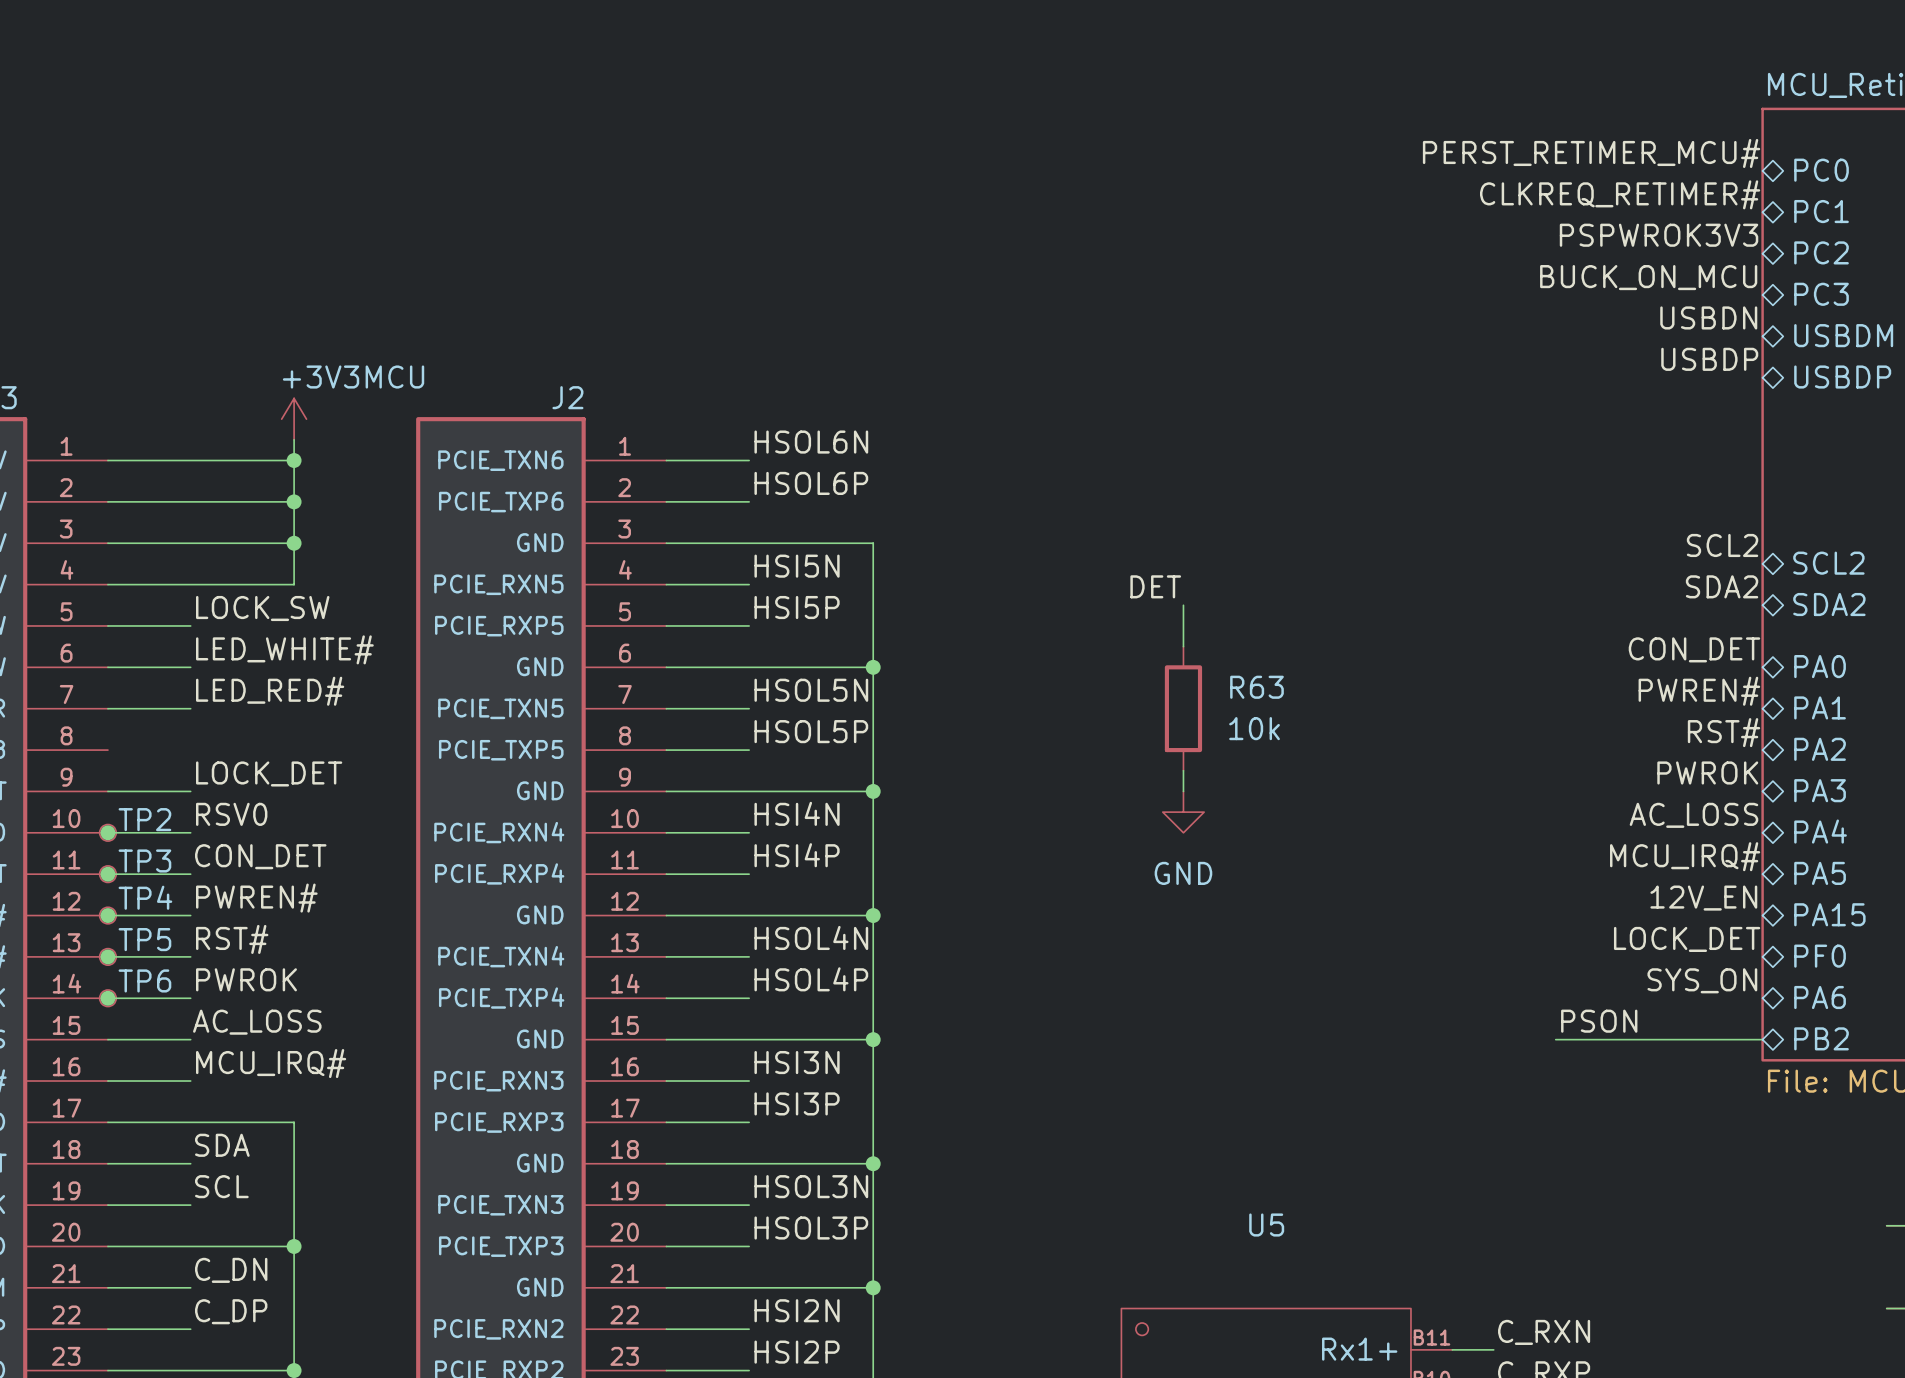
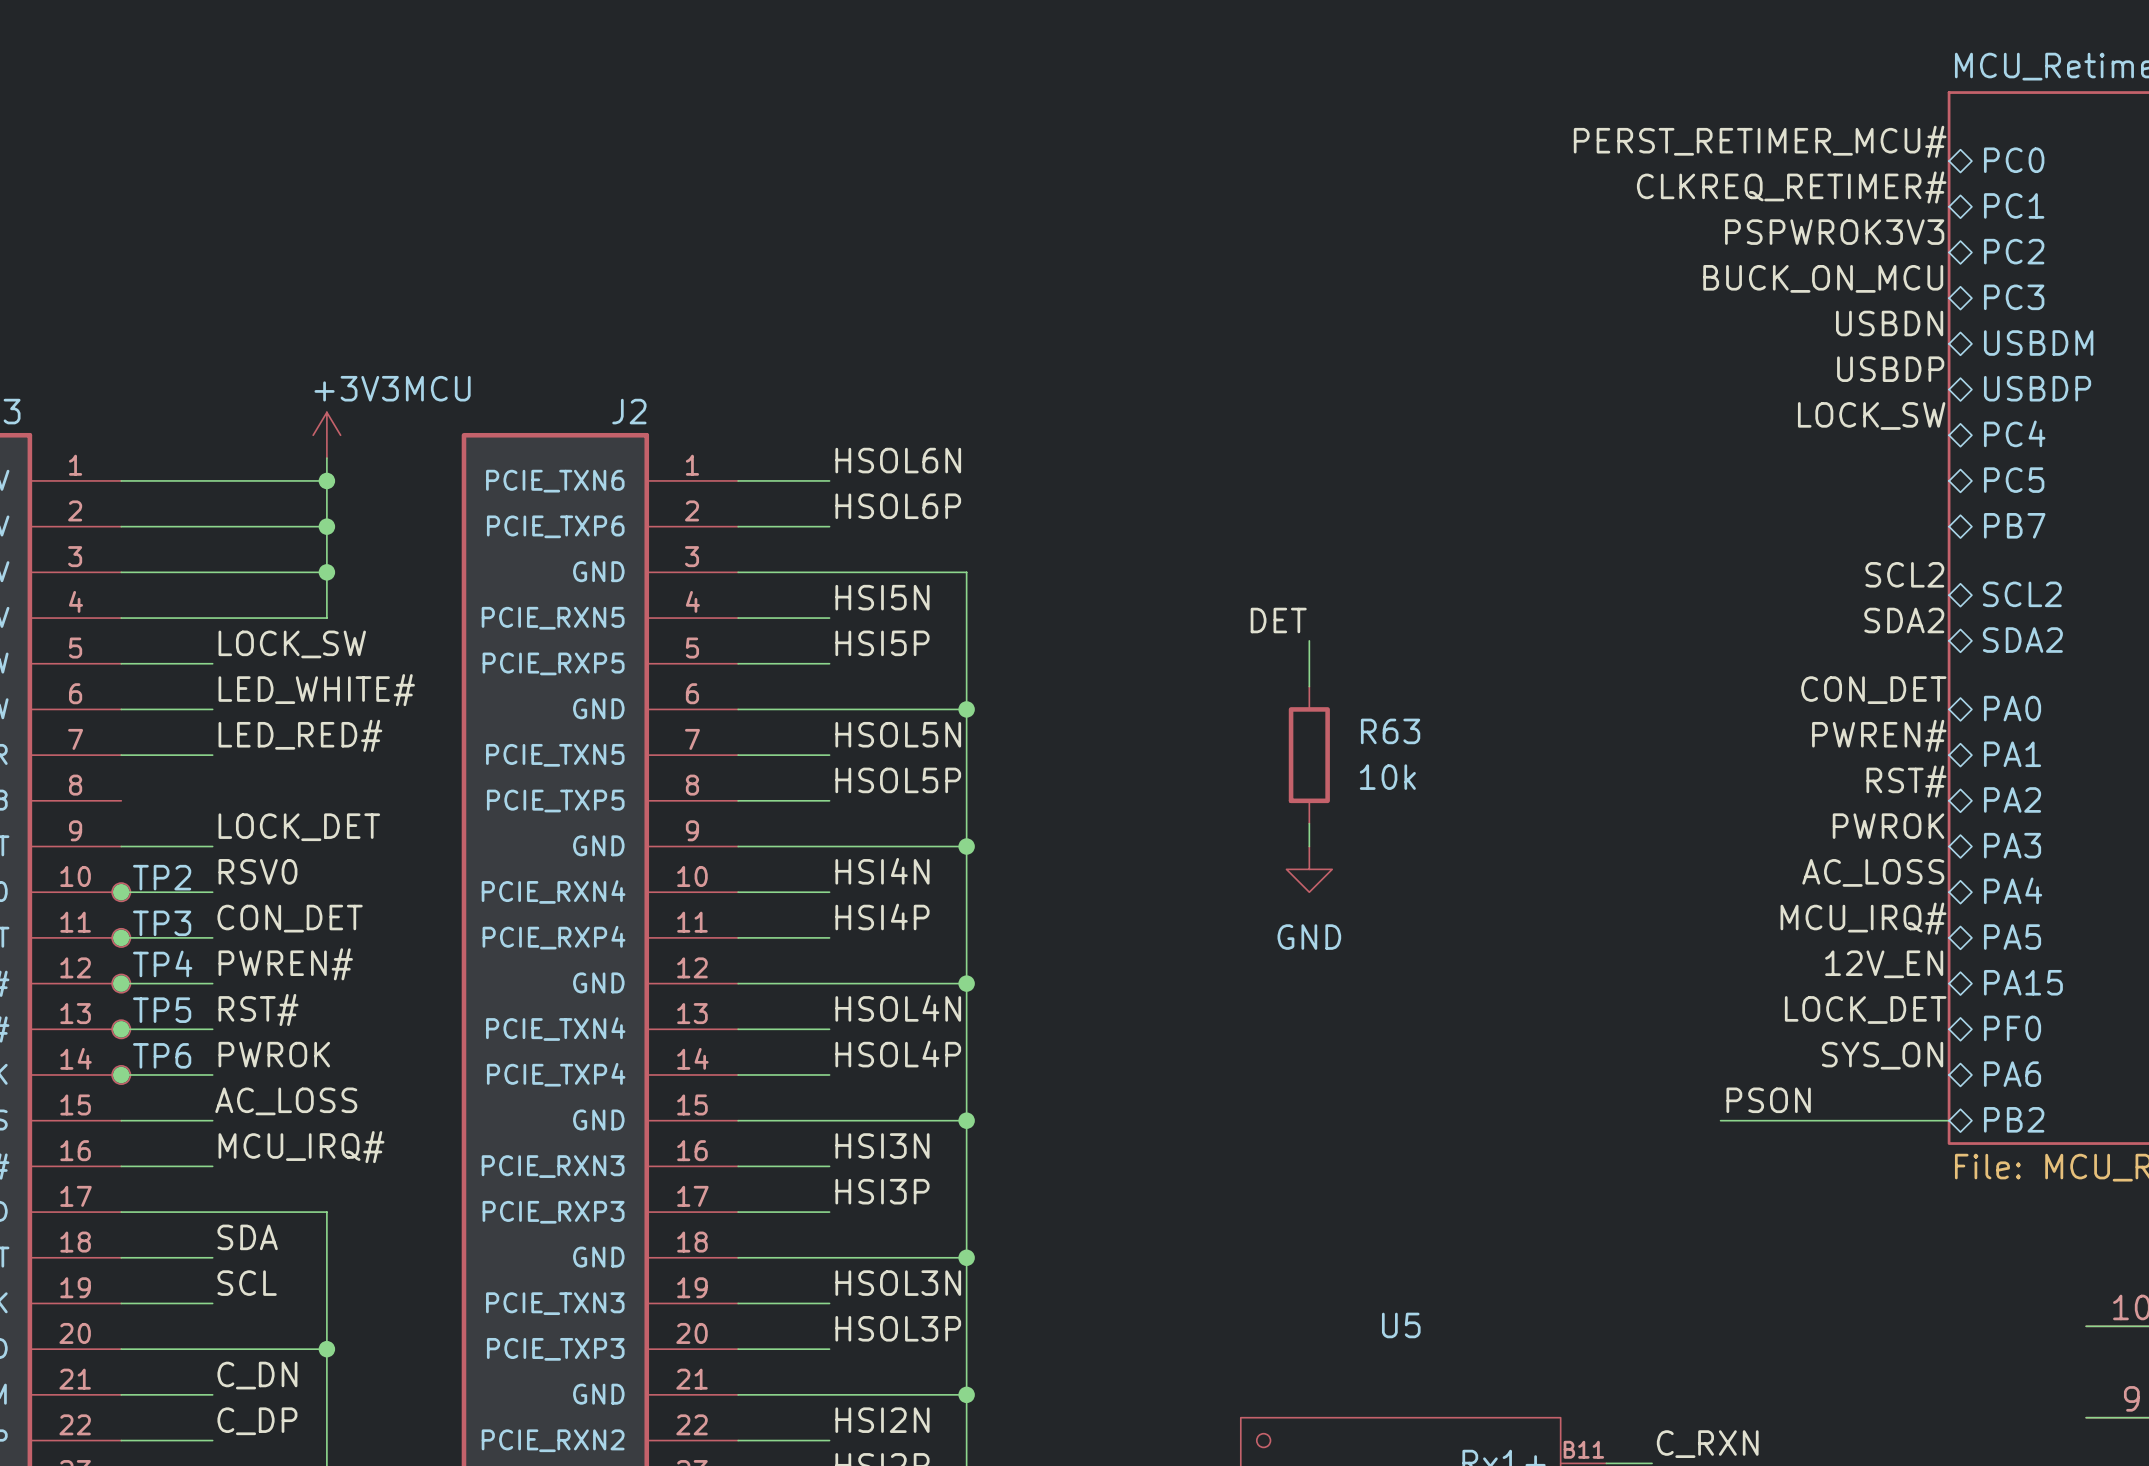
label: none -> LOCK_SW (1871, 415)
sheet pin: none -> PC4 (2014, 433)
sheet pin: none -> PC5 (2014, 480)
sheet pin: none -> PB7 (2014, 525)

